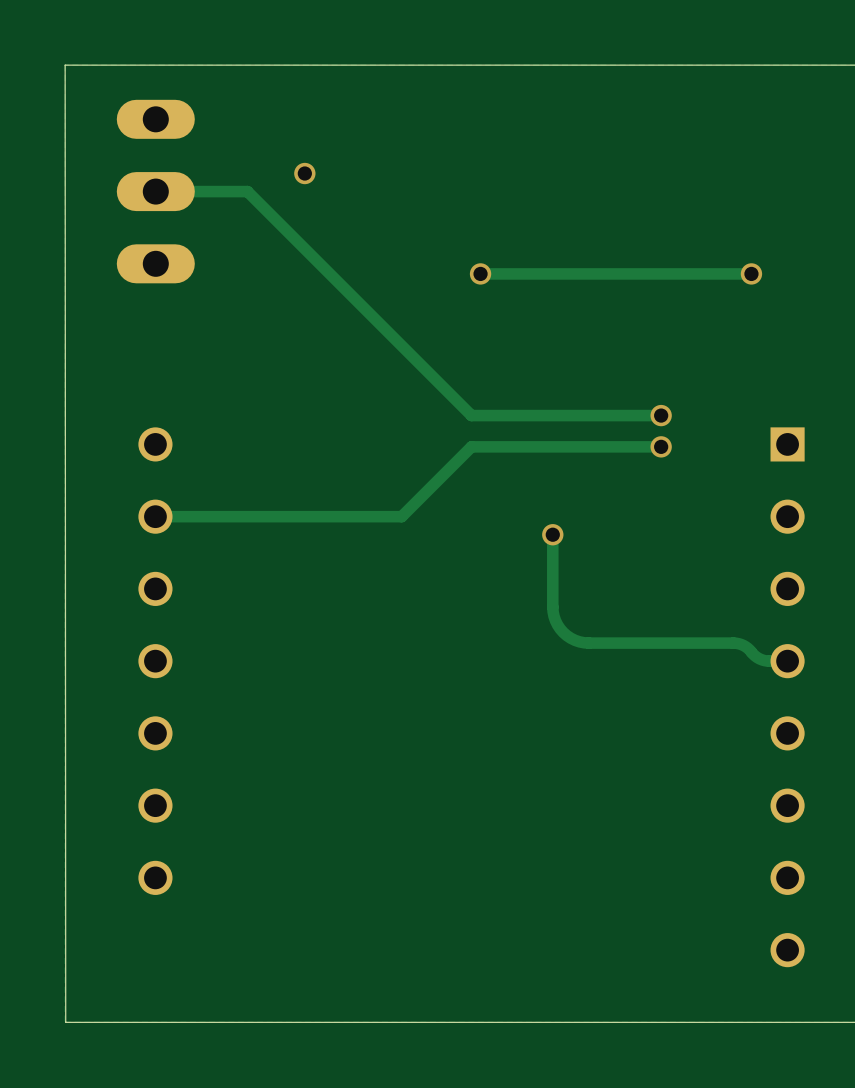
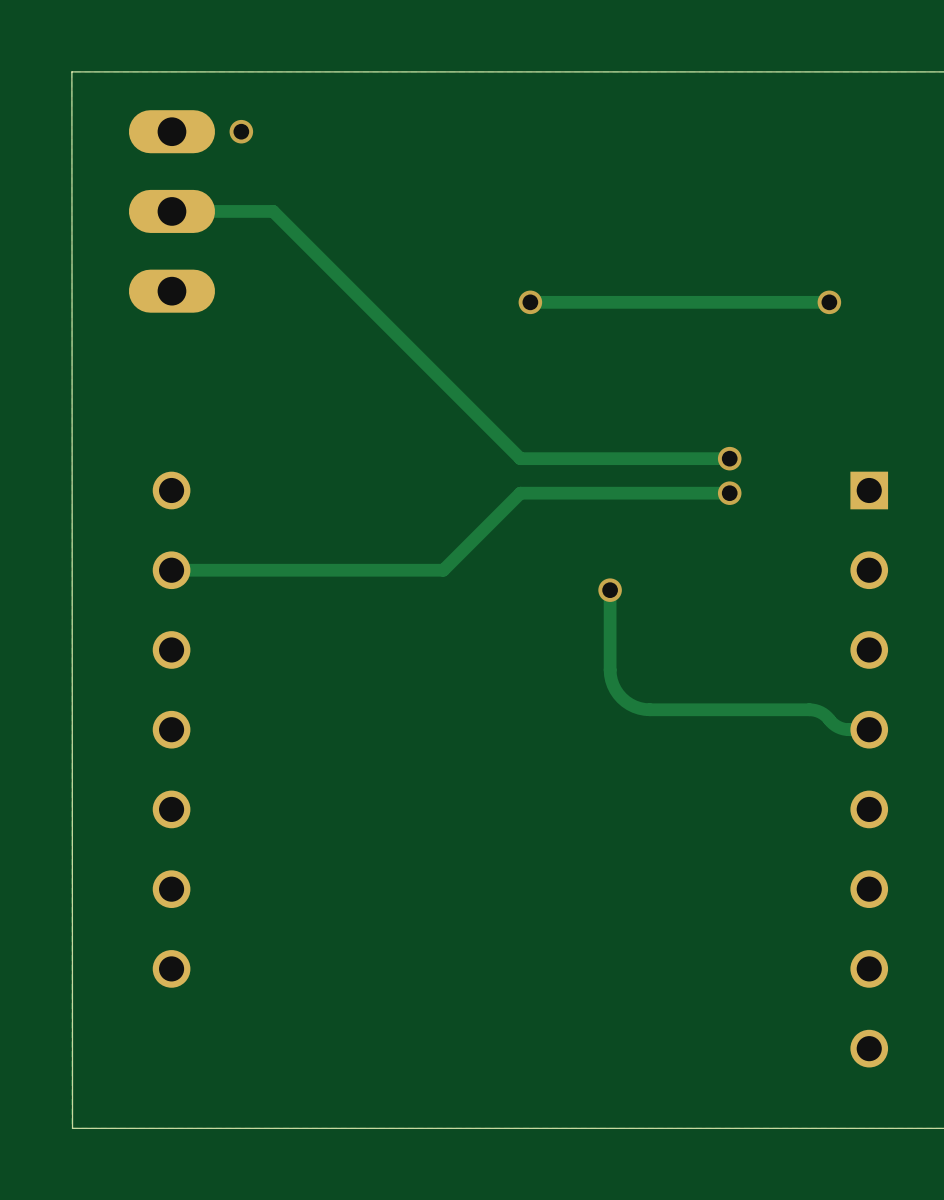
via position: (304, 173) -> (241, 131)

